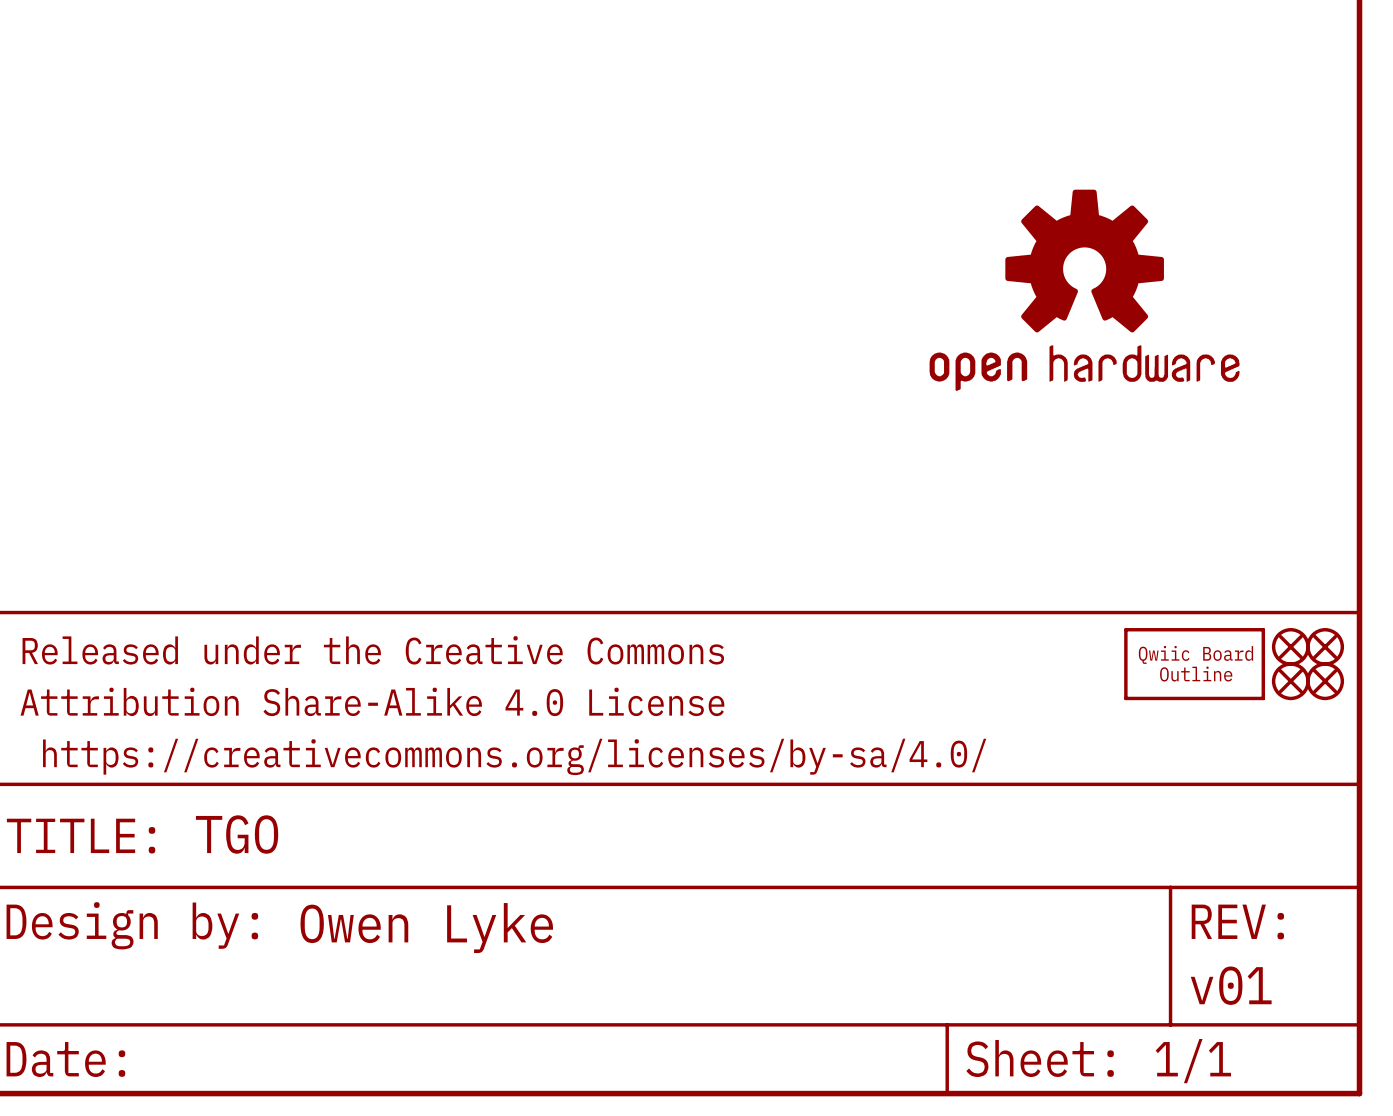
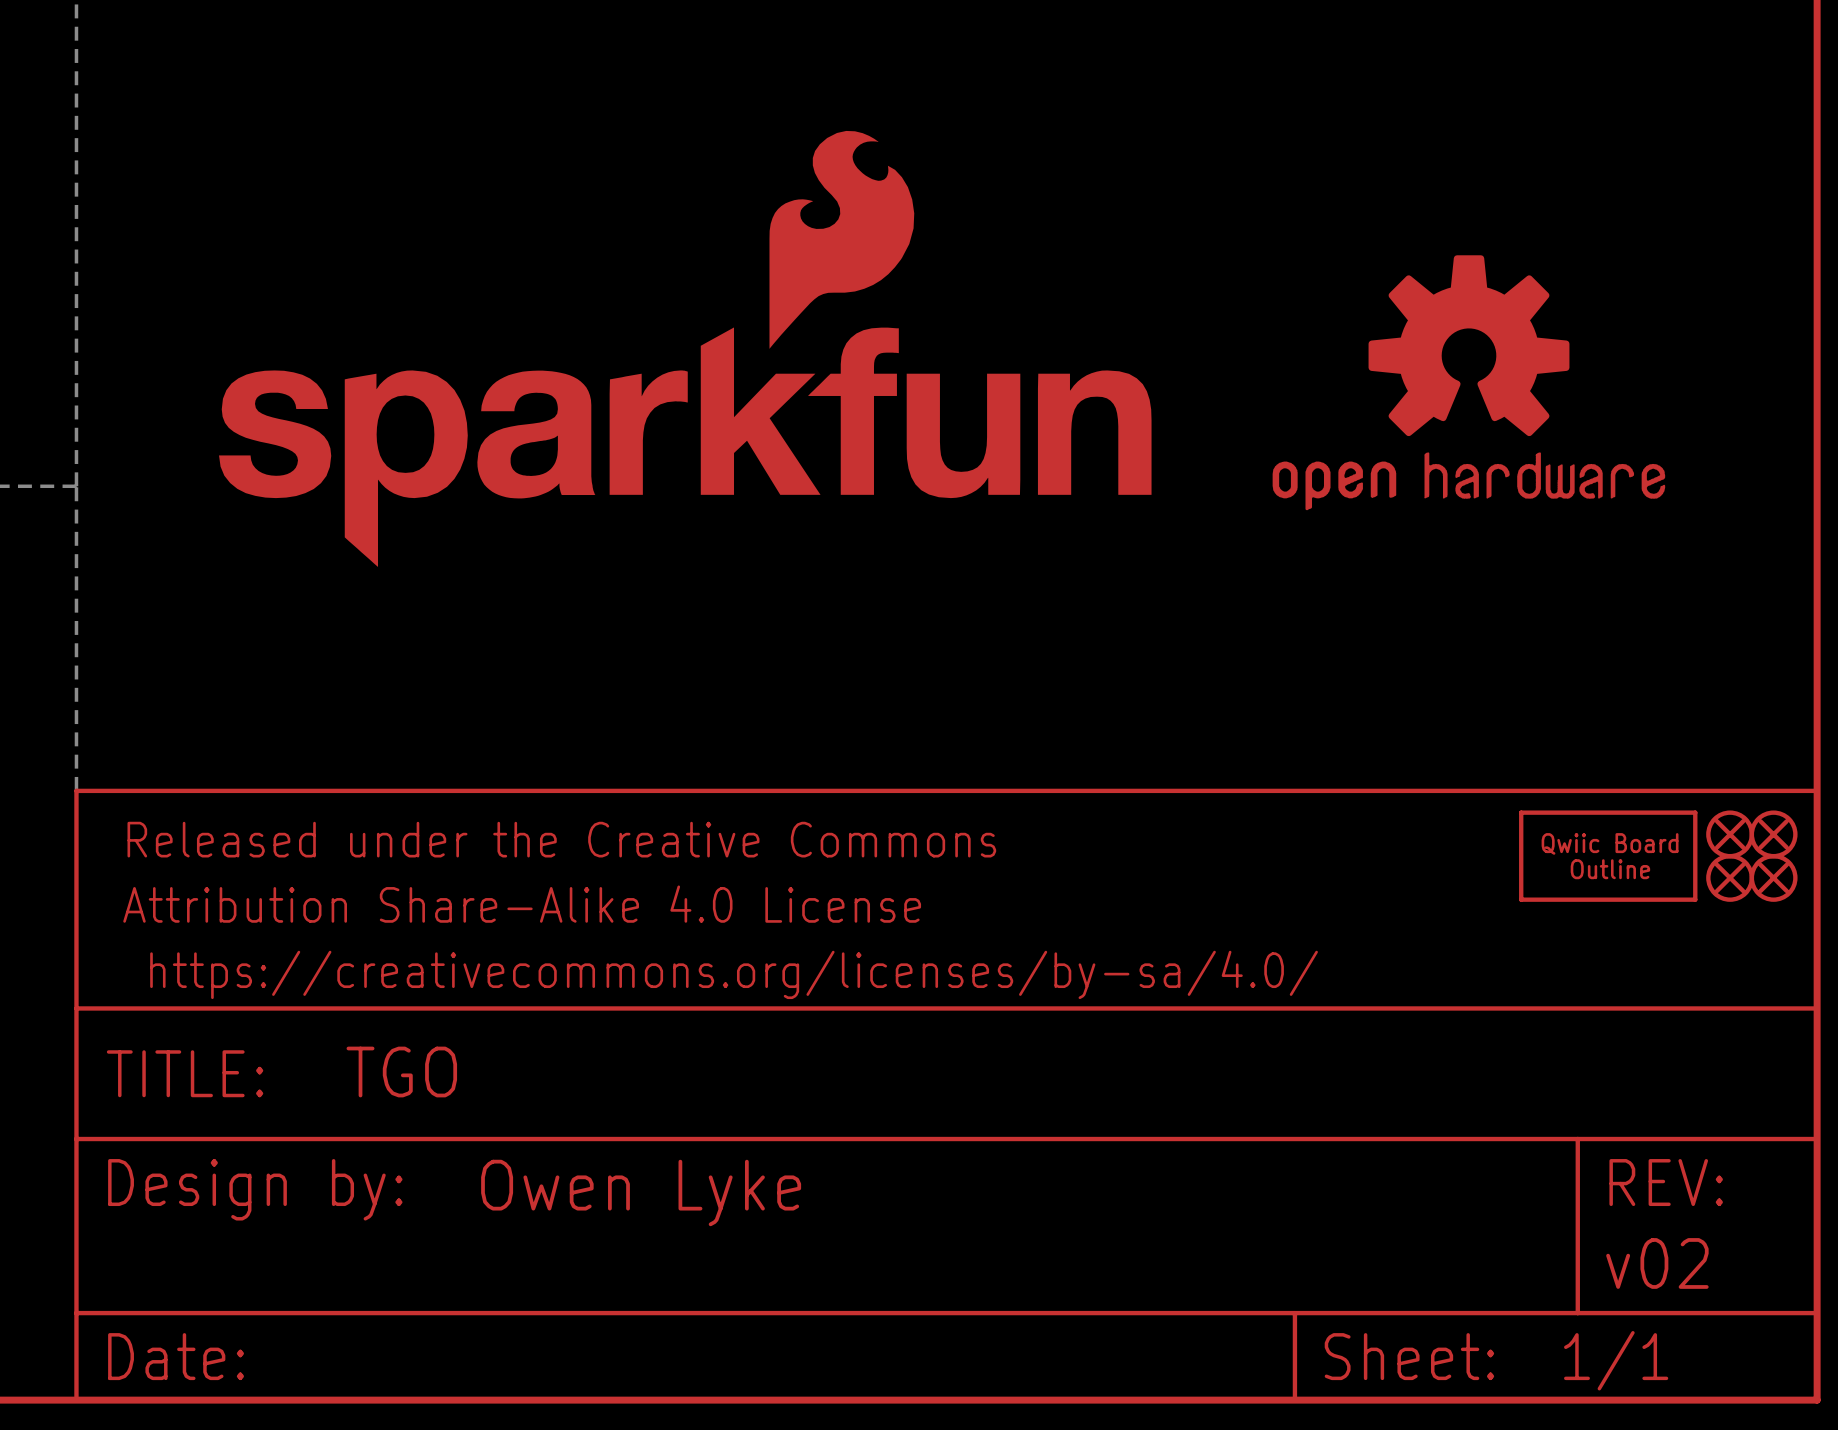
part: none -> (685, 348)
part text: v01 (1231, 985) -> v02 (1657, 1263)

